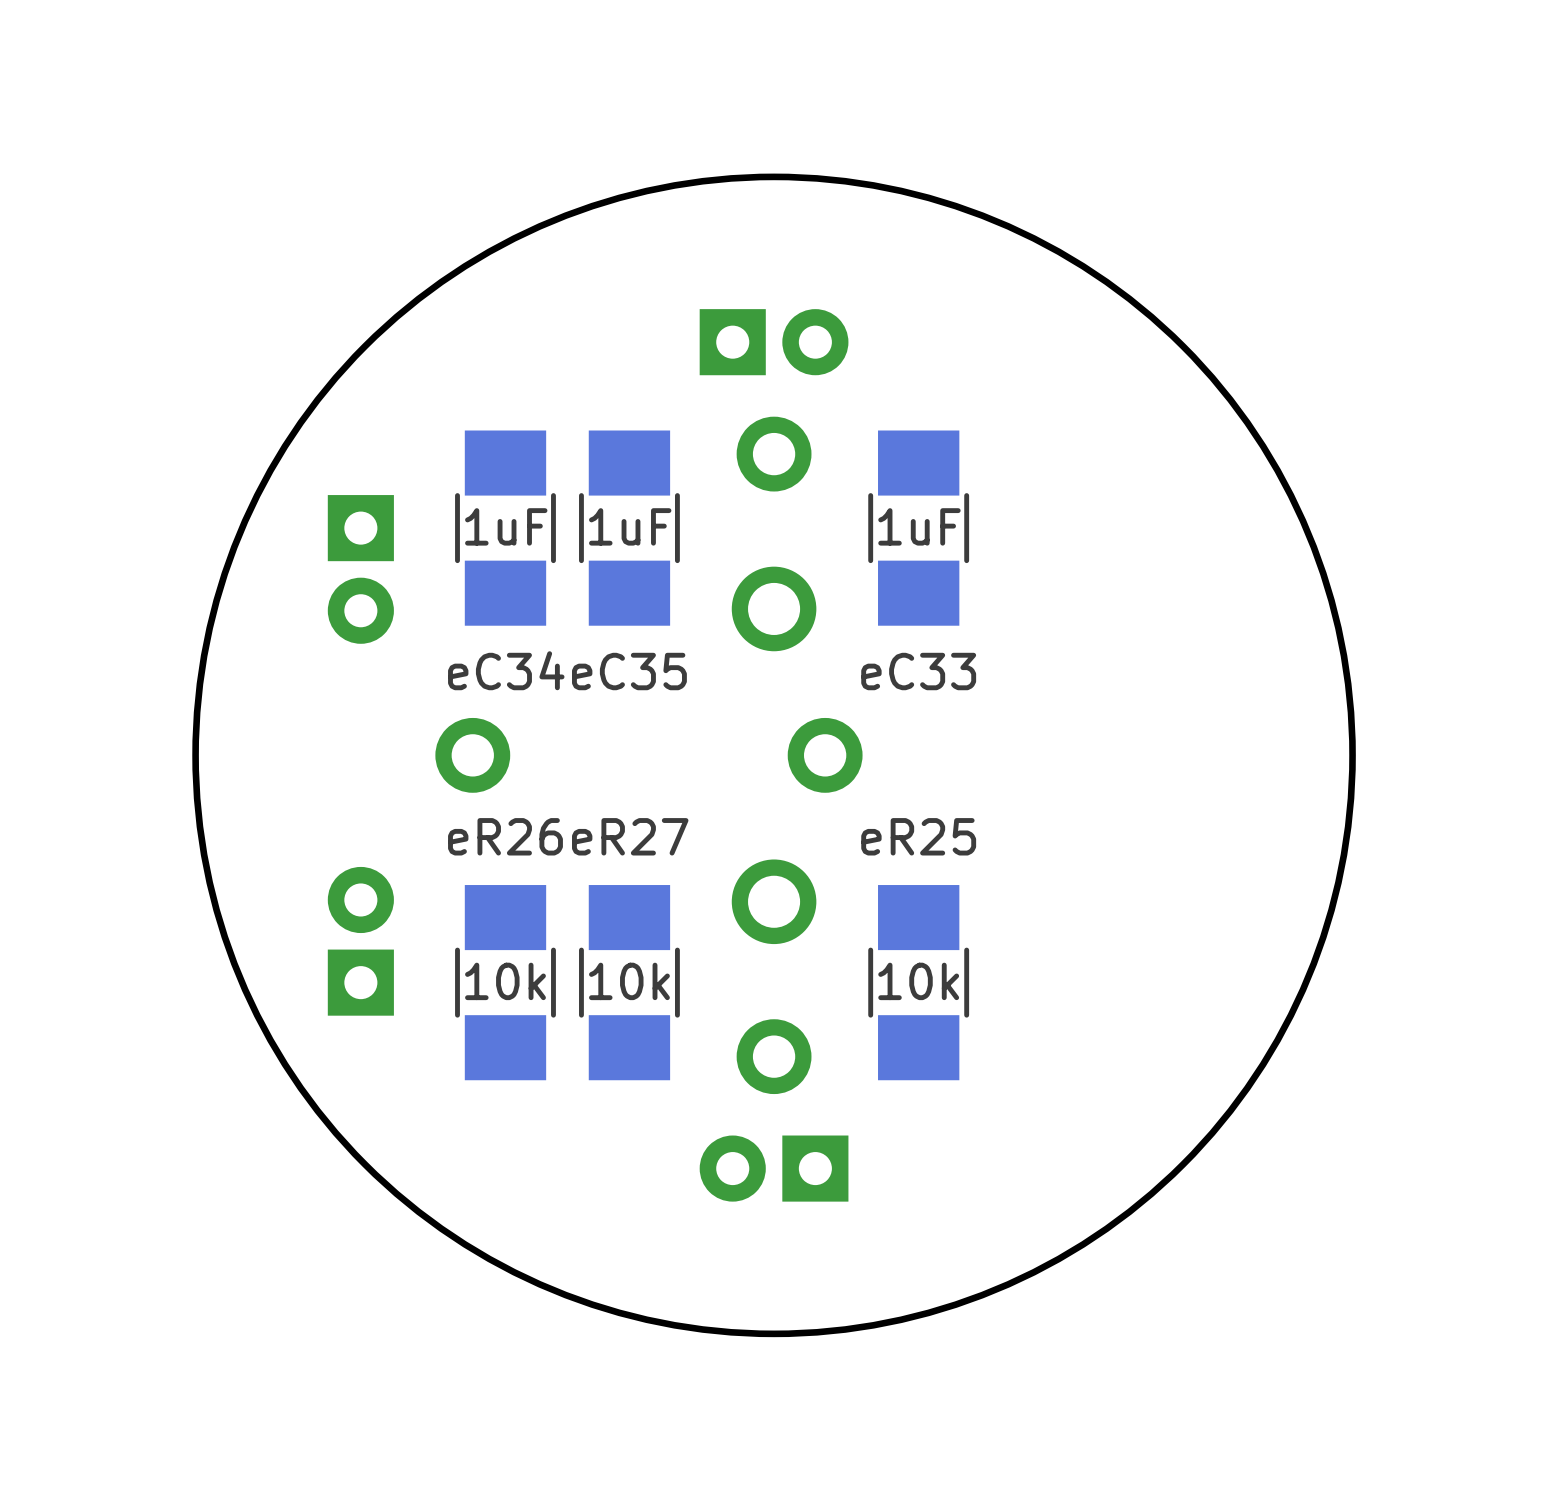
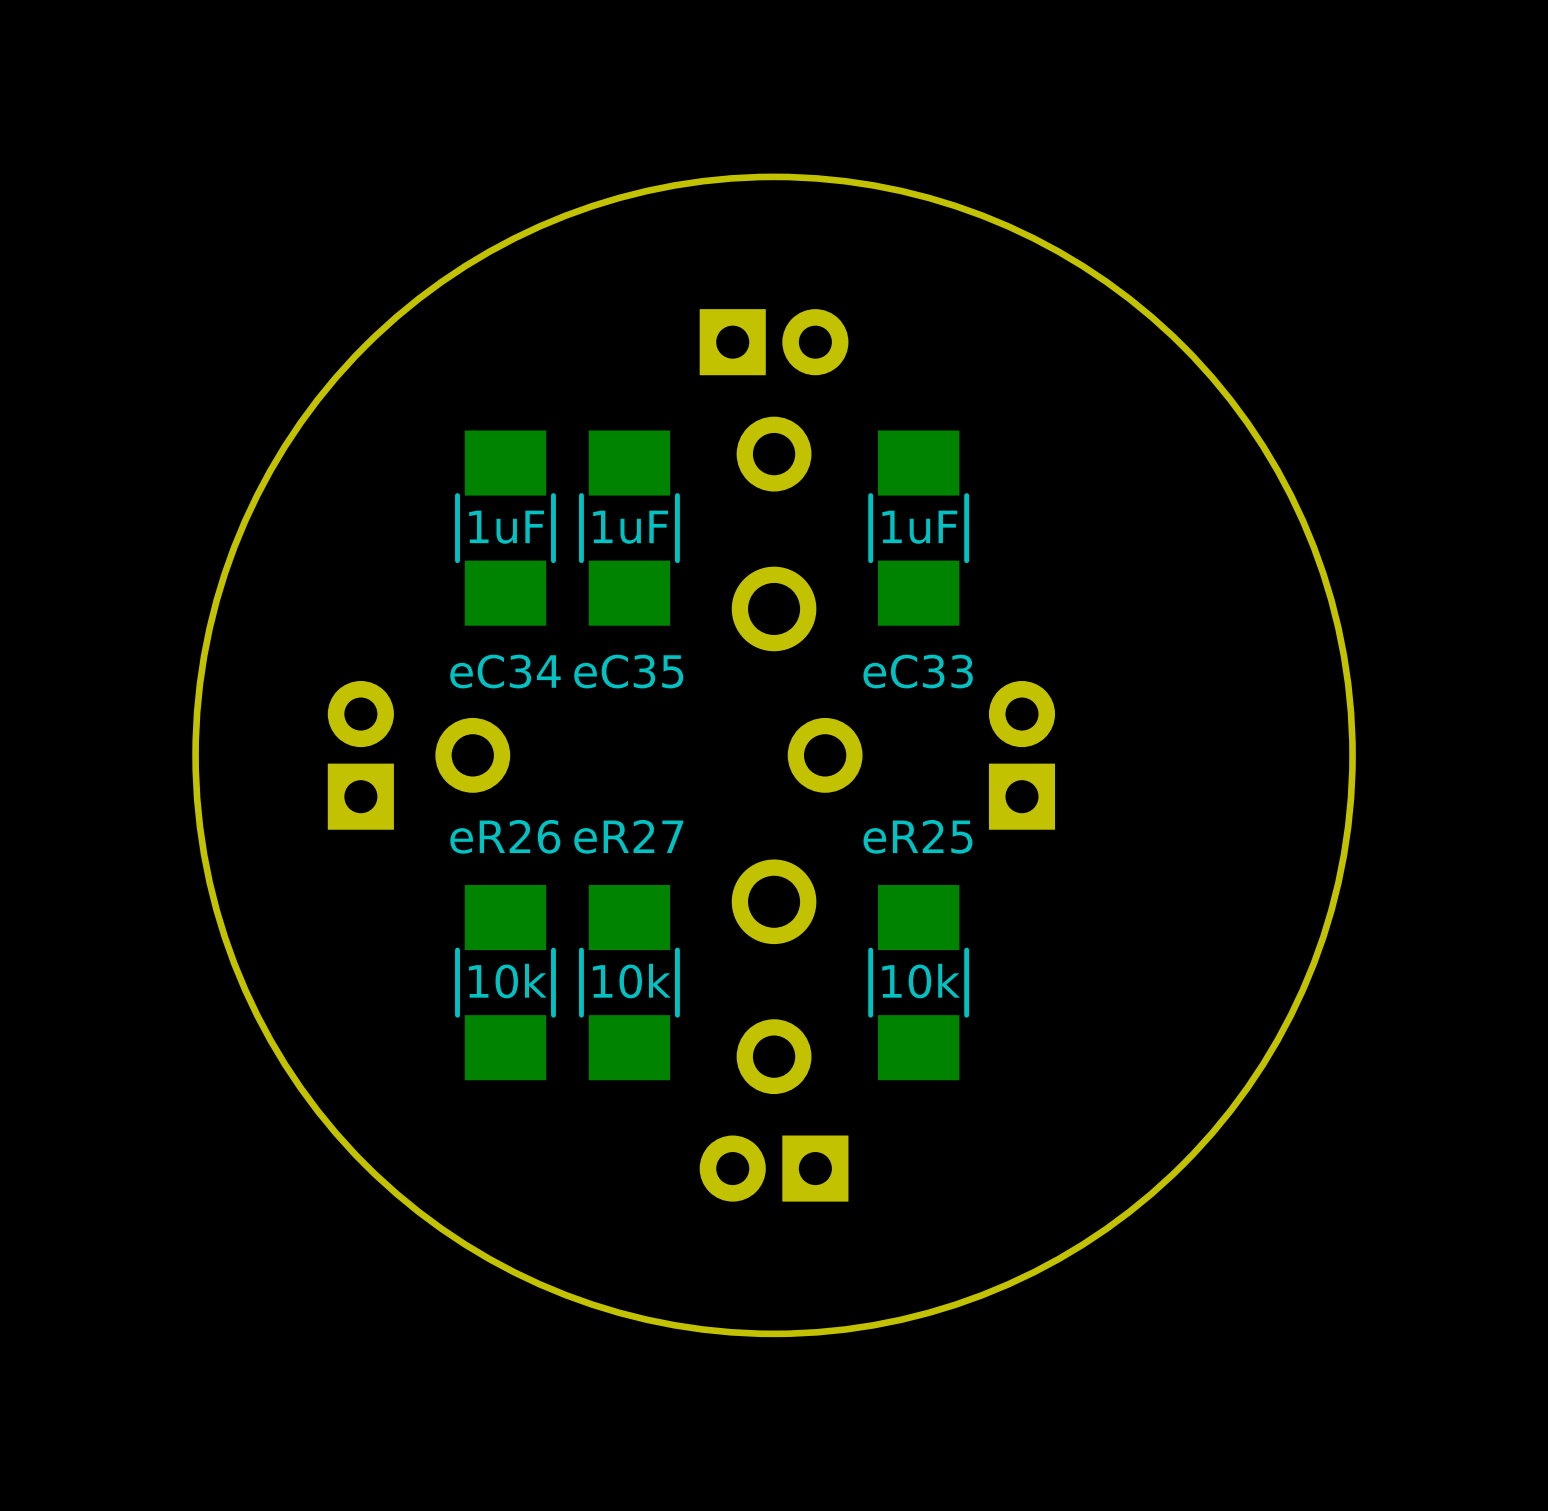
part: (360, 569) -> none
part: none -> (360, 755)
part: none -> (1021, 755)
part: (360, 941) -> none

